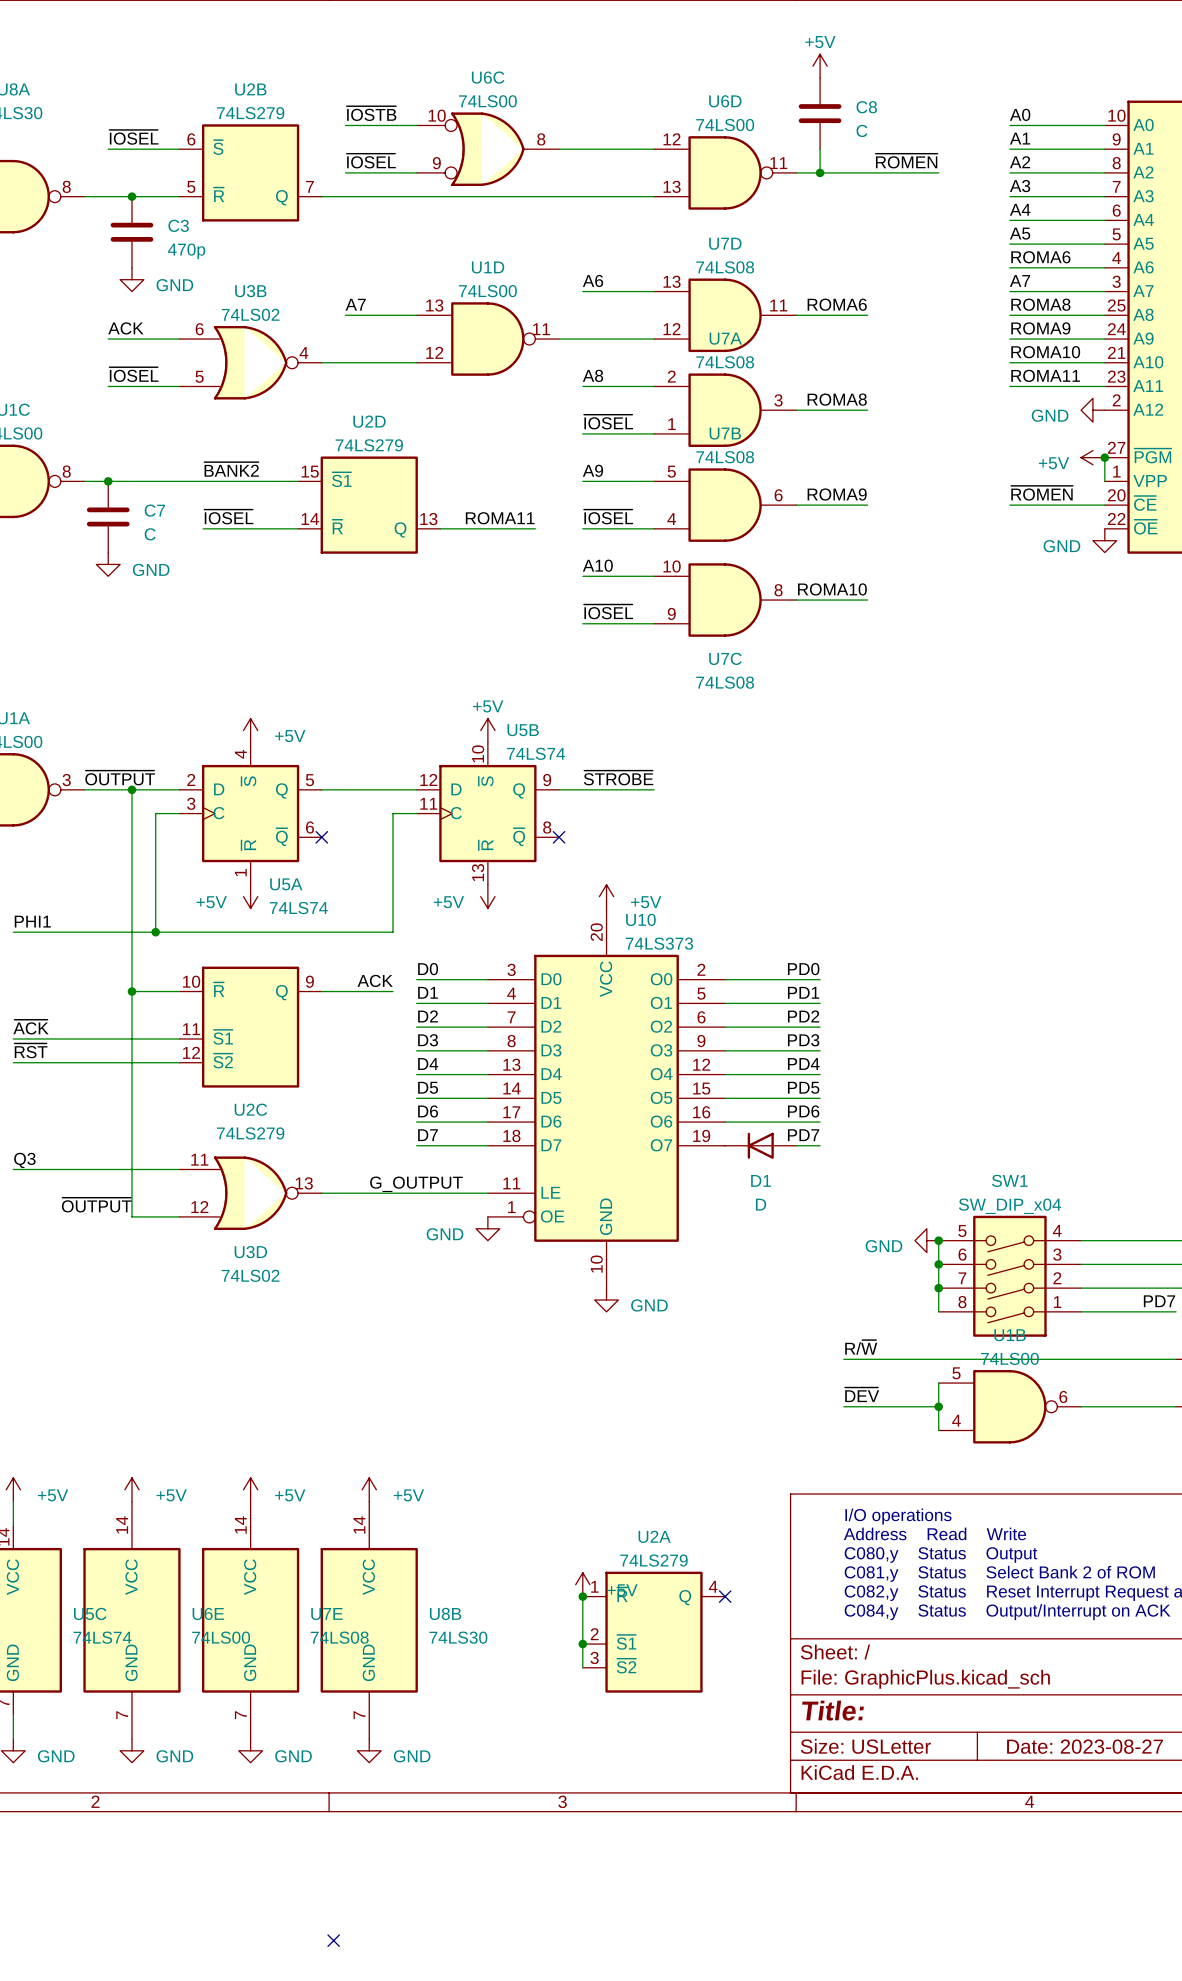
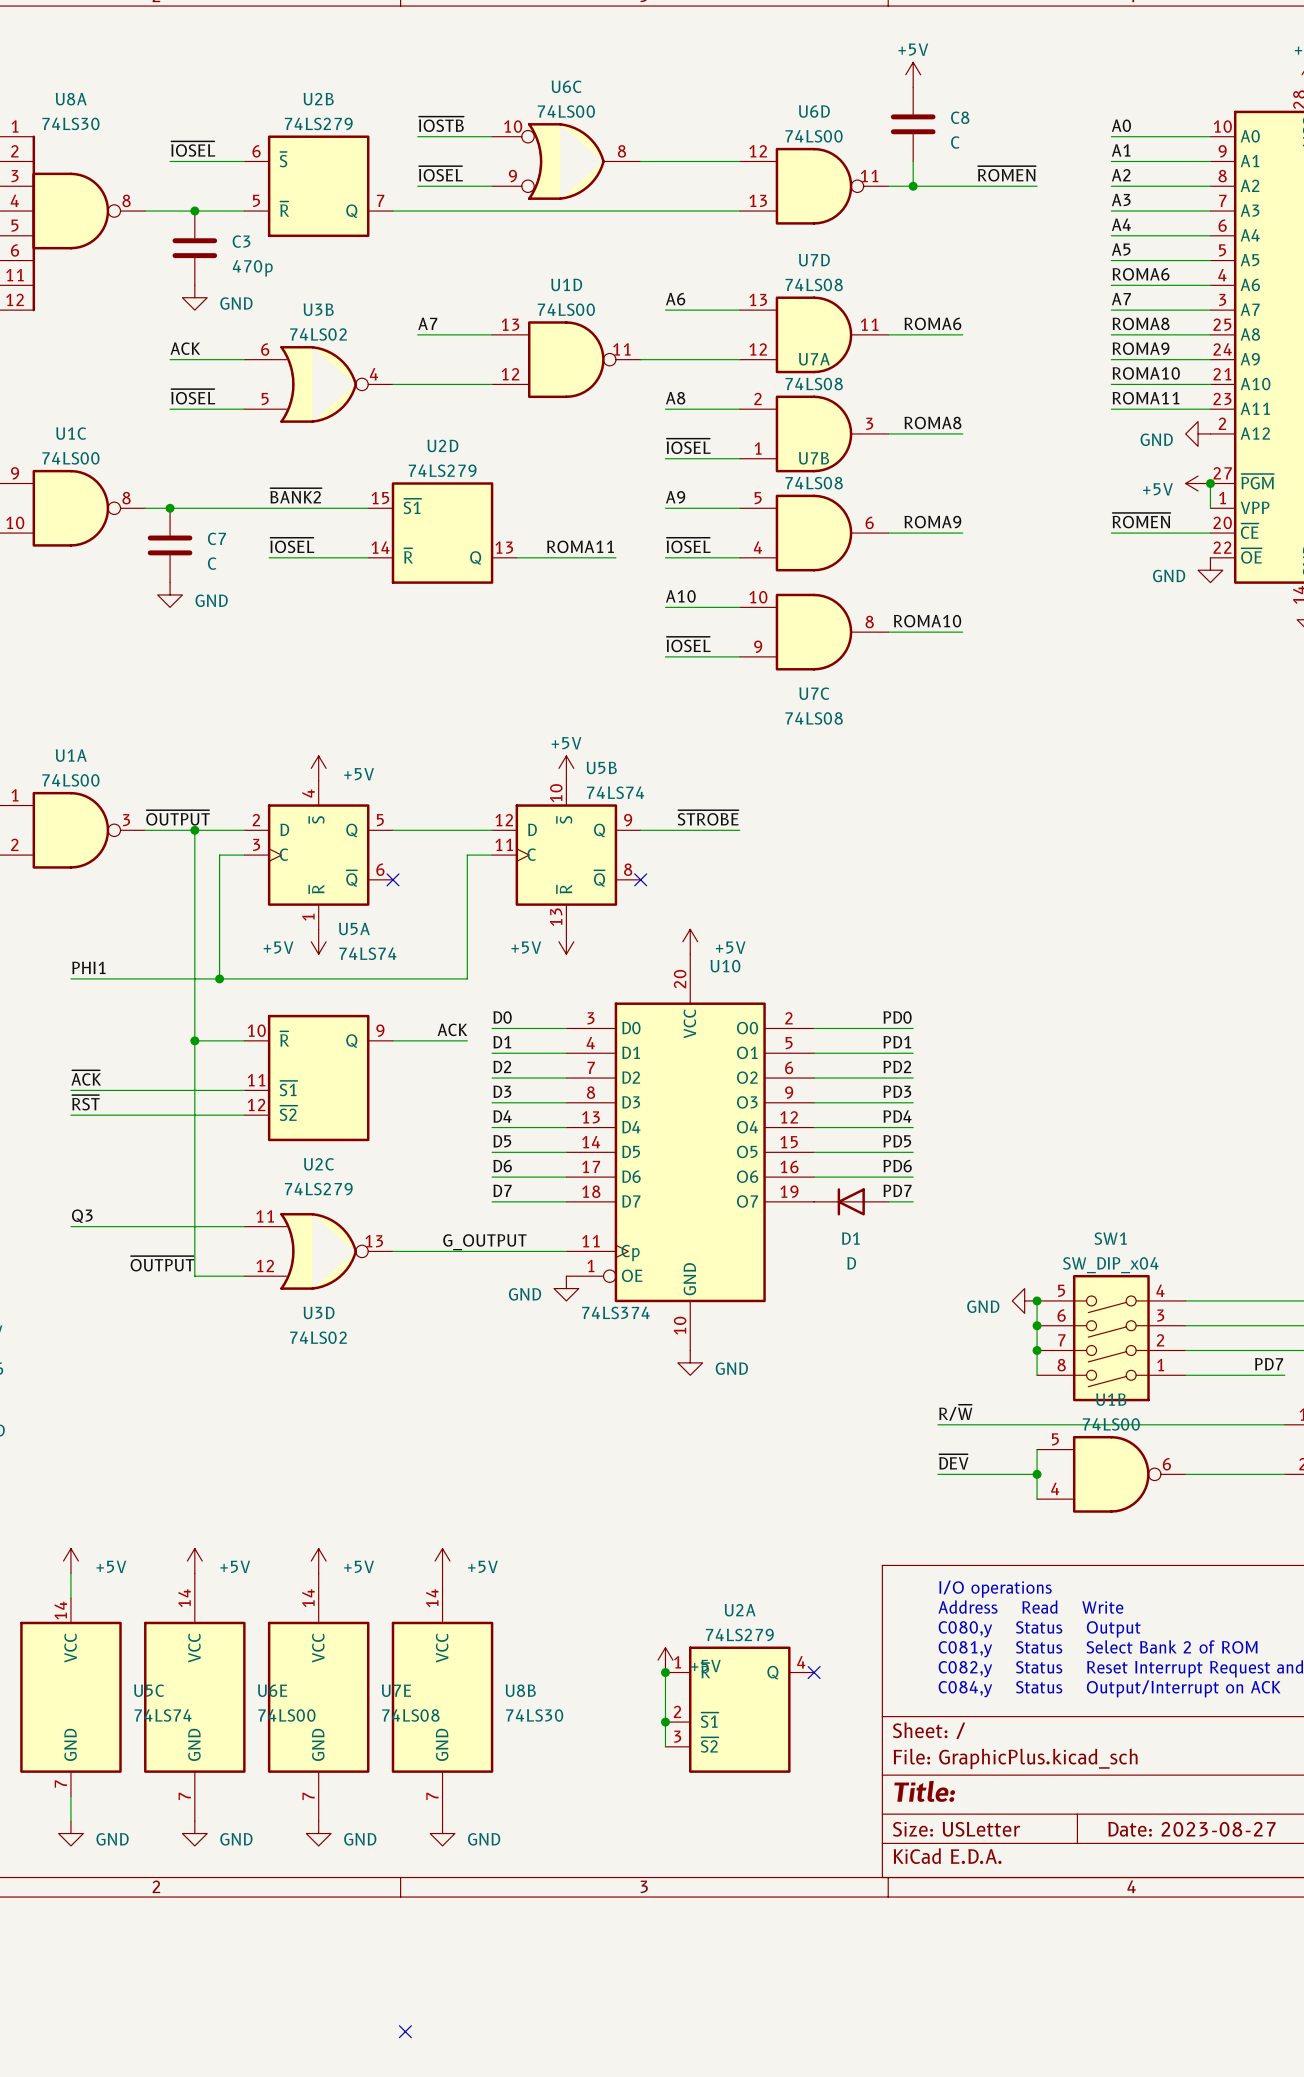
U10 symbol: [487, 908, 726, 1289] -> [566, 954, 815, 1351]
U10 value: 74LS373 (659, 943) -> 74LS374 (615, 1312)

